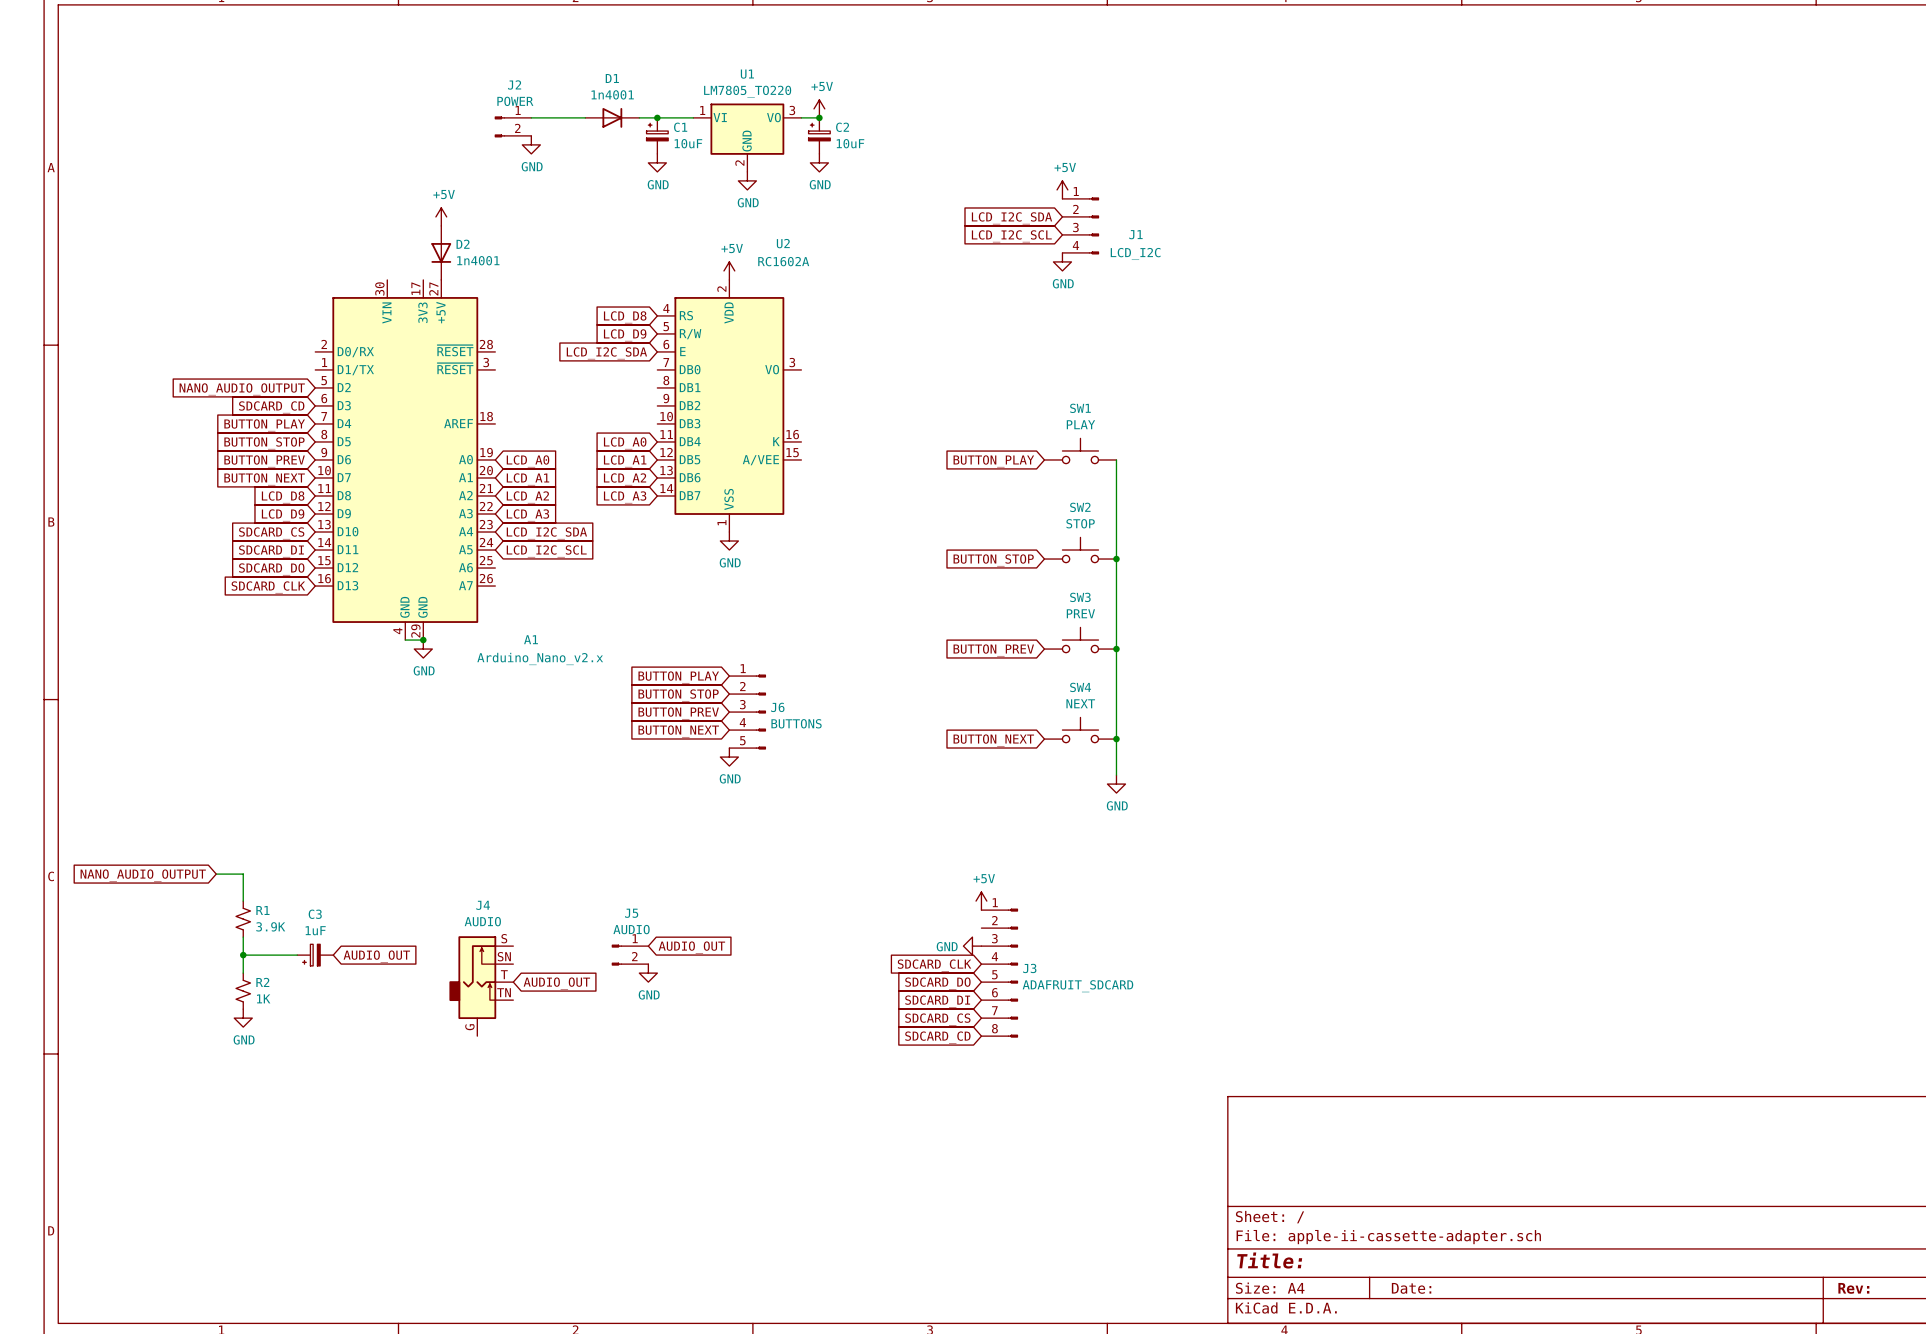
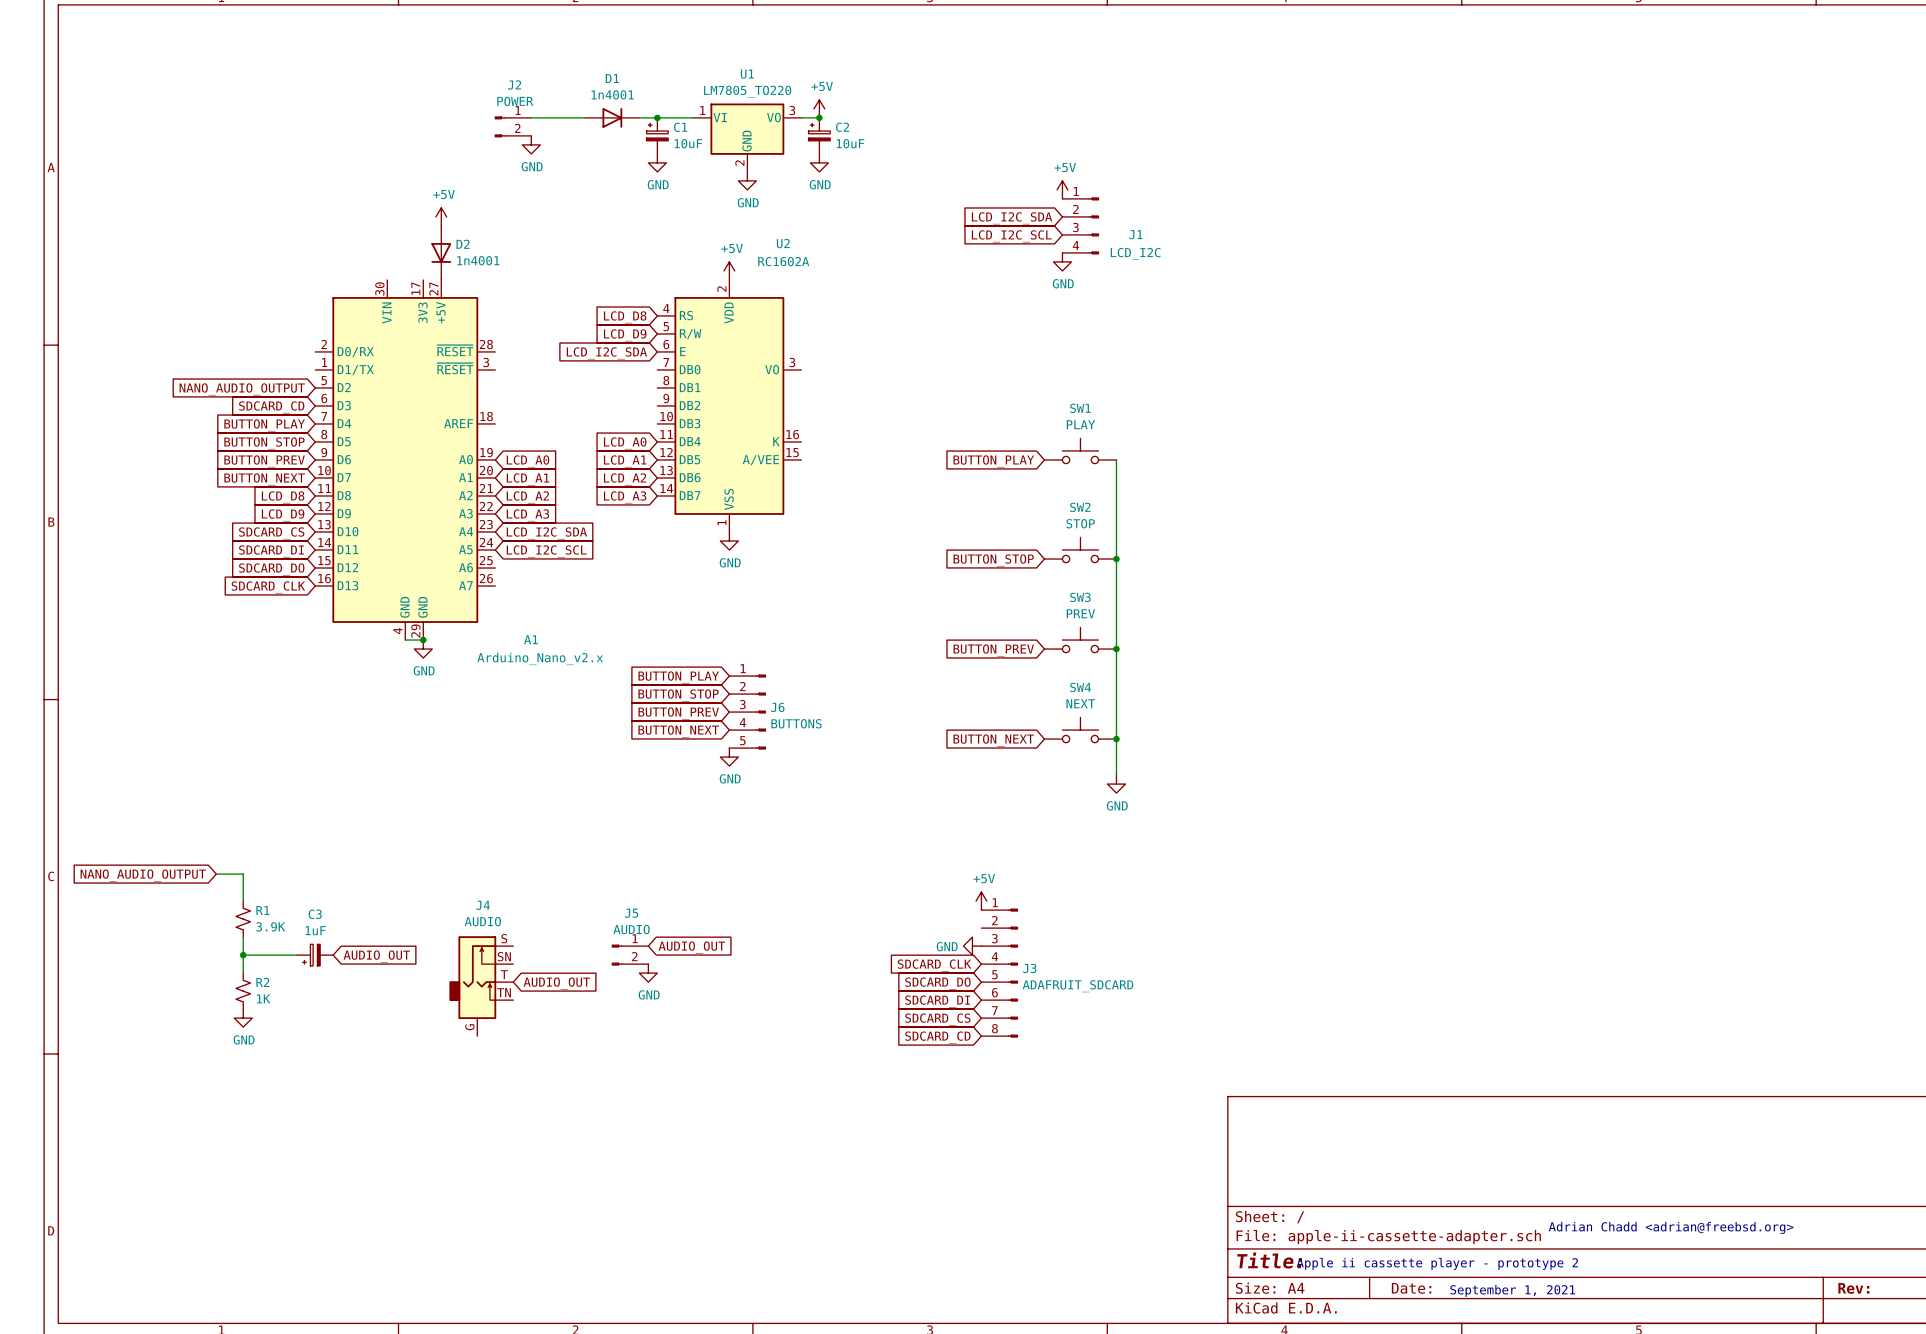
text: none -> Adrian Chadd <adrian@freebsd.org> (1671, 1227)
text: none -> Apple ii cassette player - prototype 2 (1437, 1263)
text: none -> September 1, 2021 (1512, 1290)

